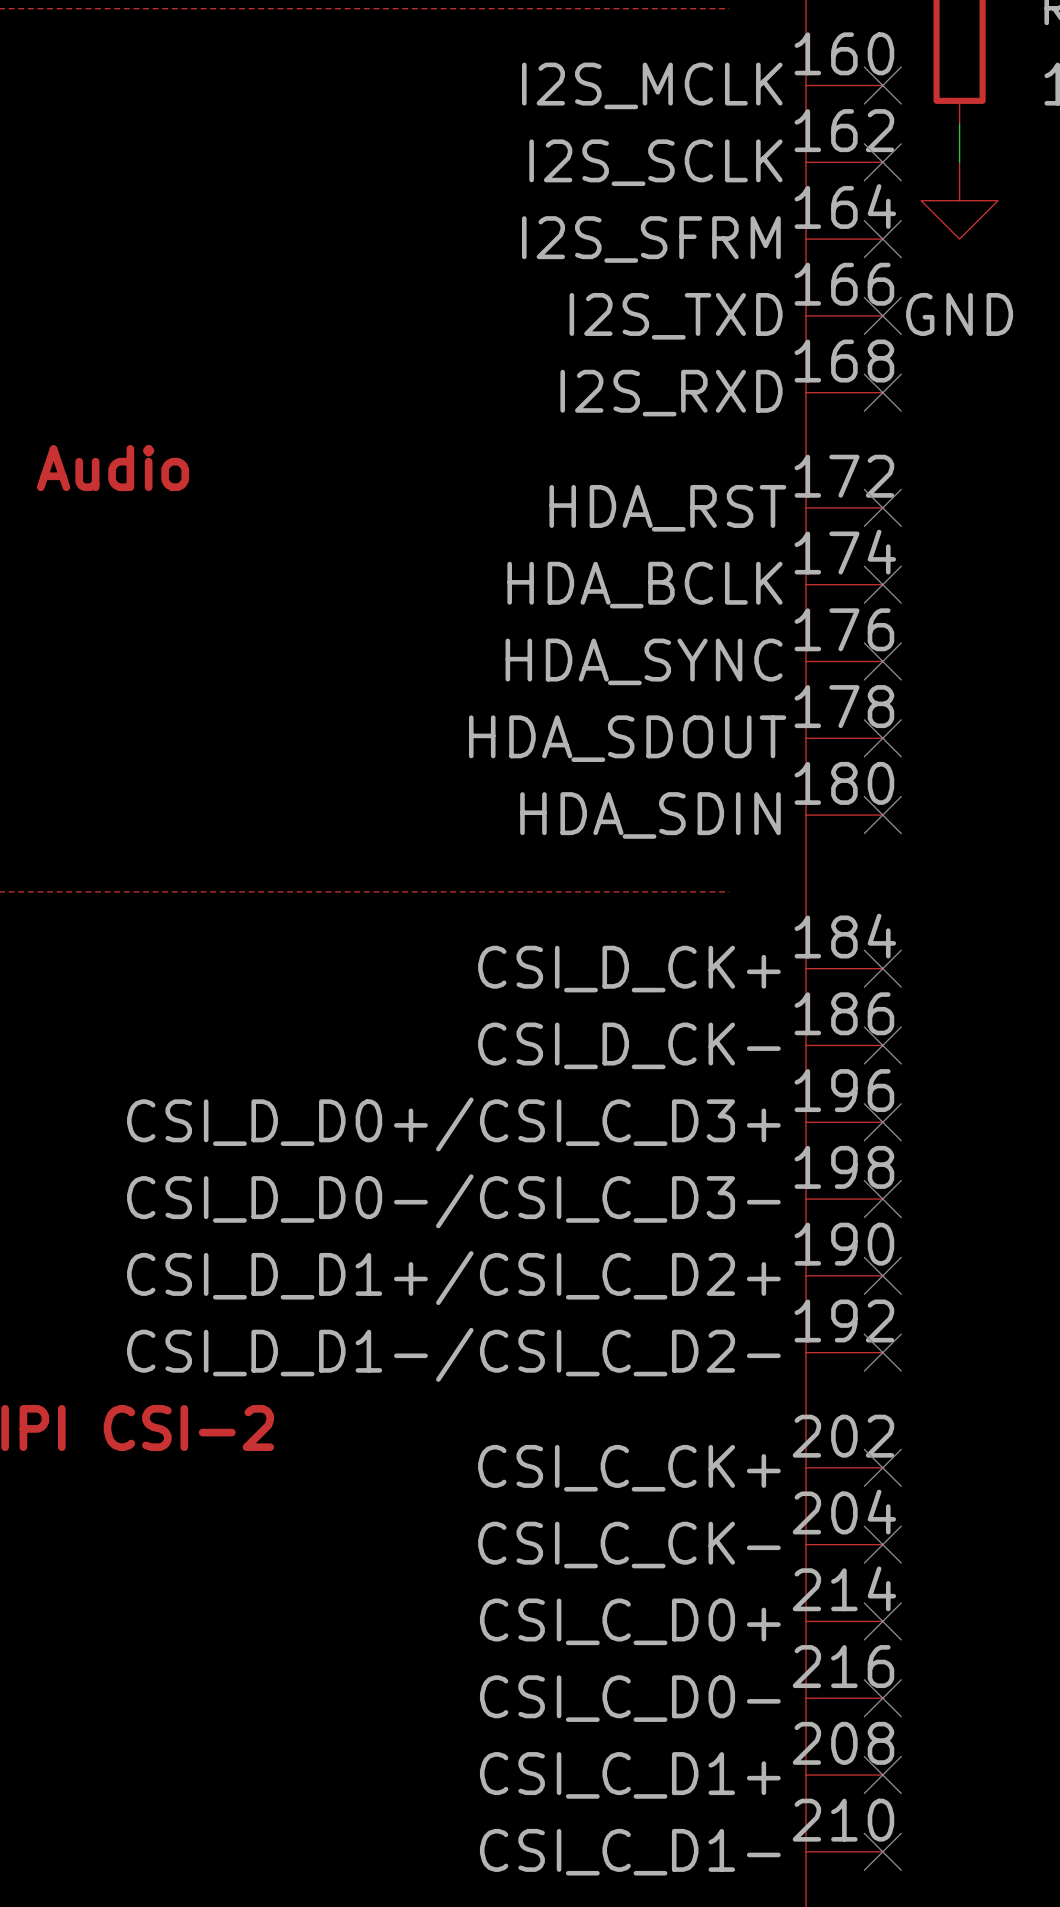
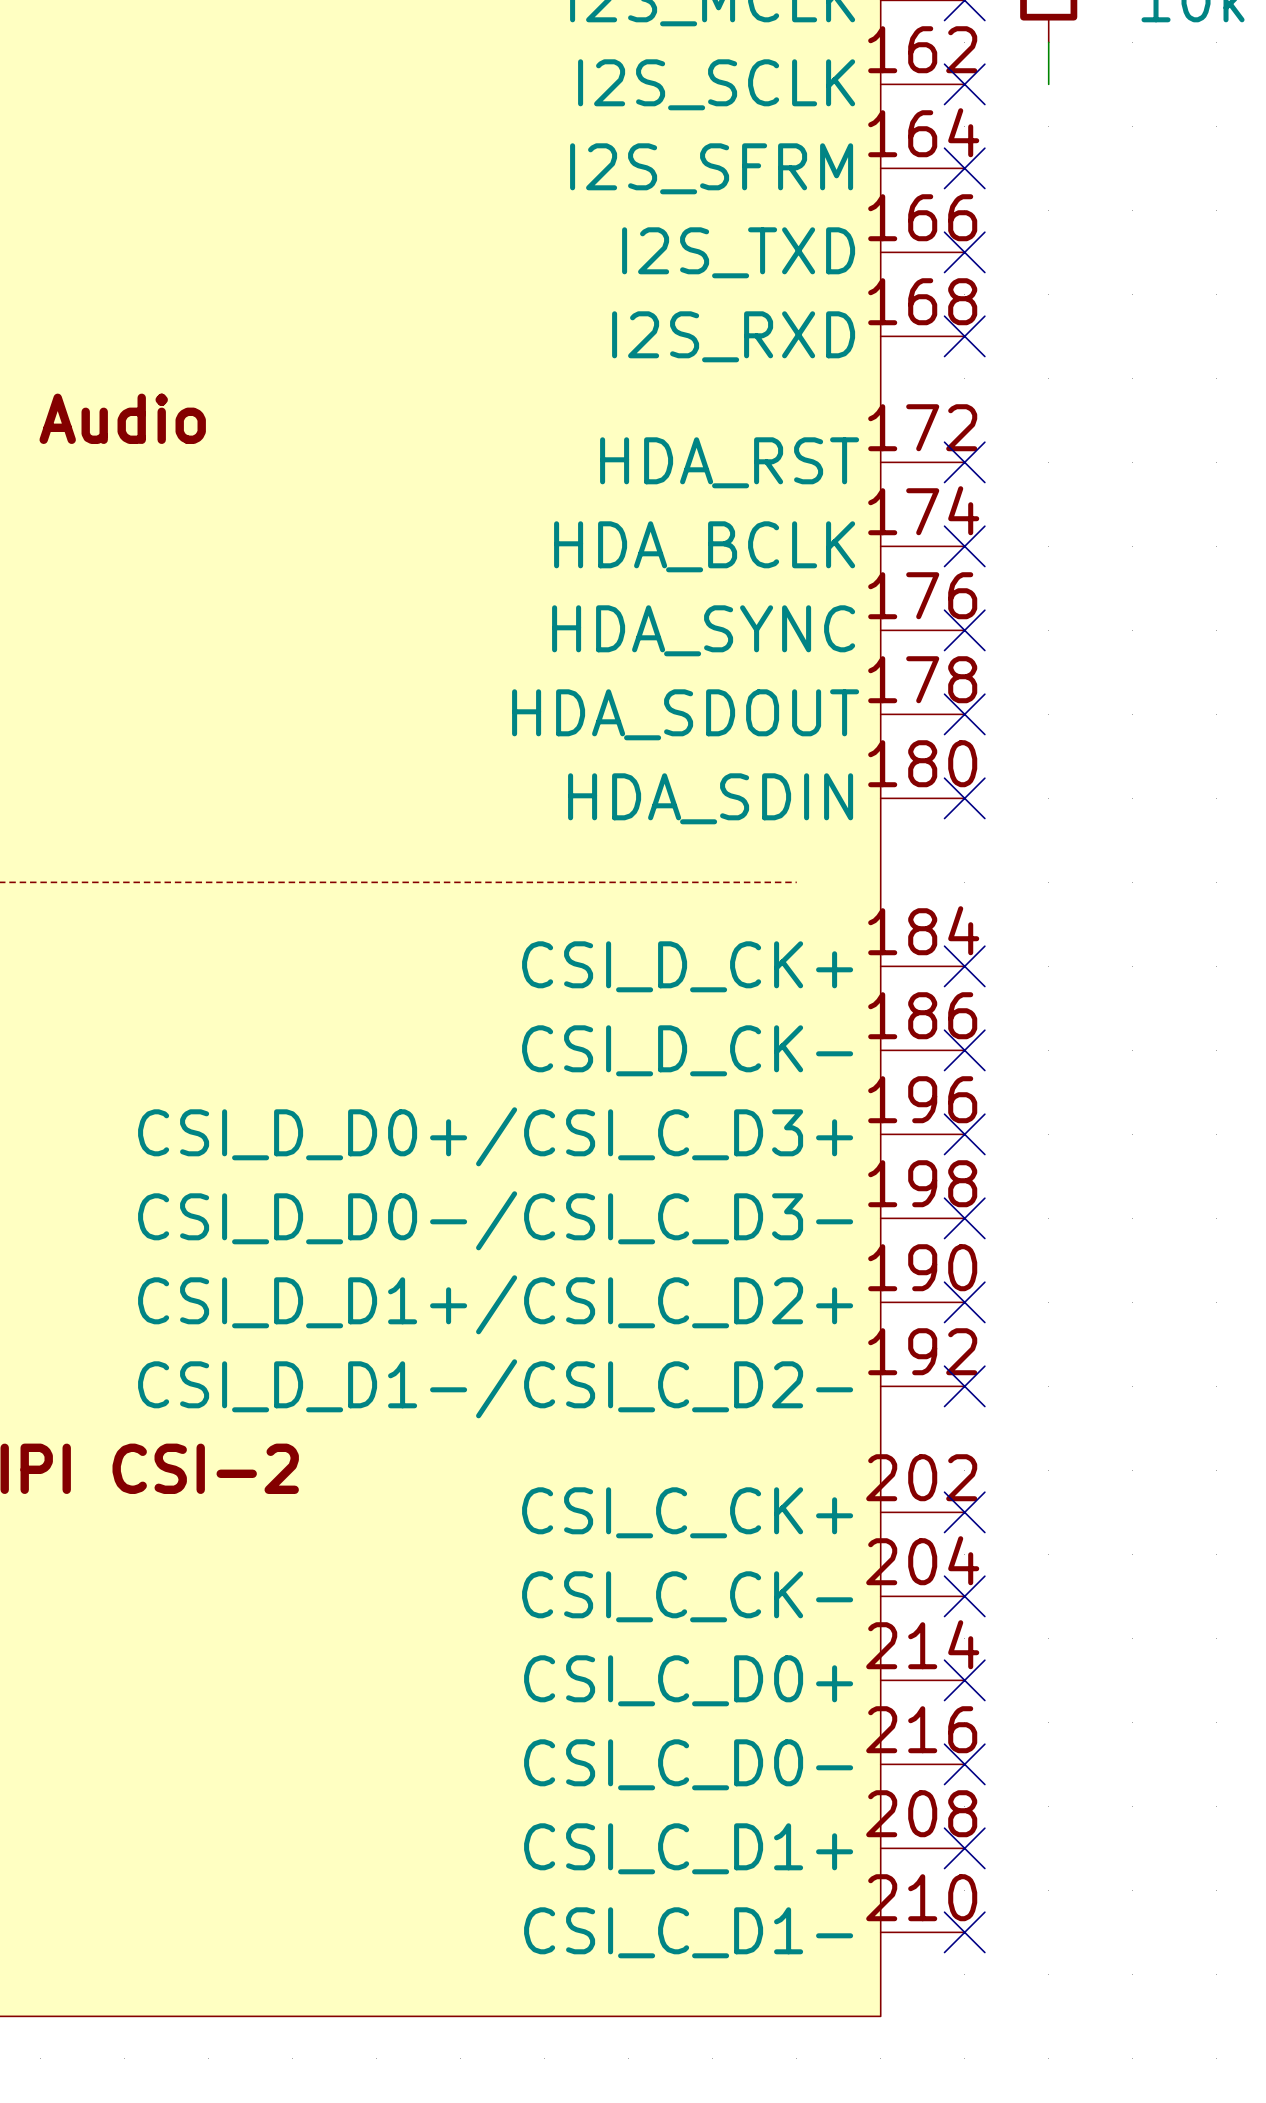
power symbol: GND (959, 200) -> none

